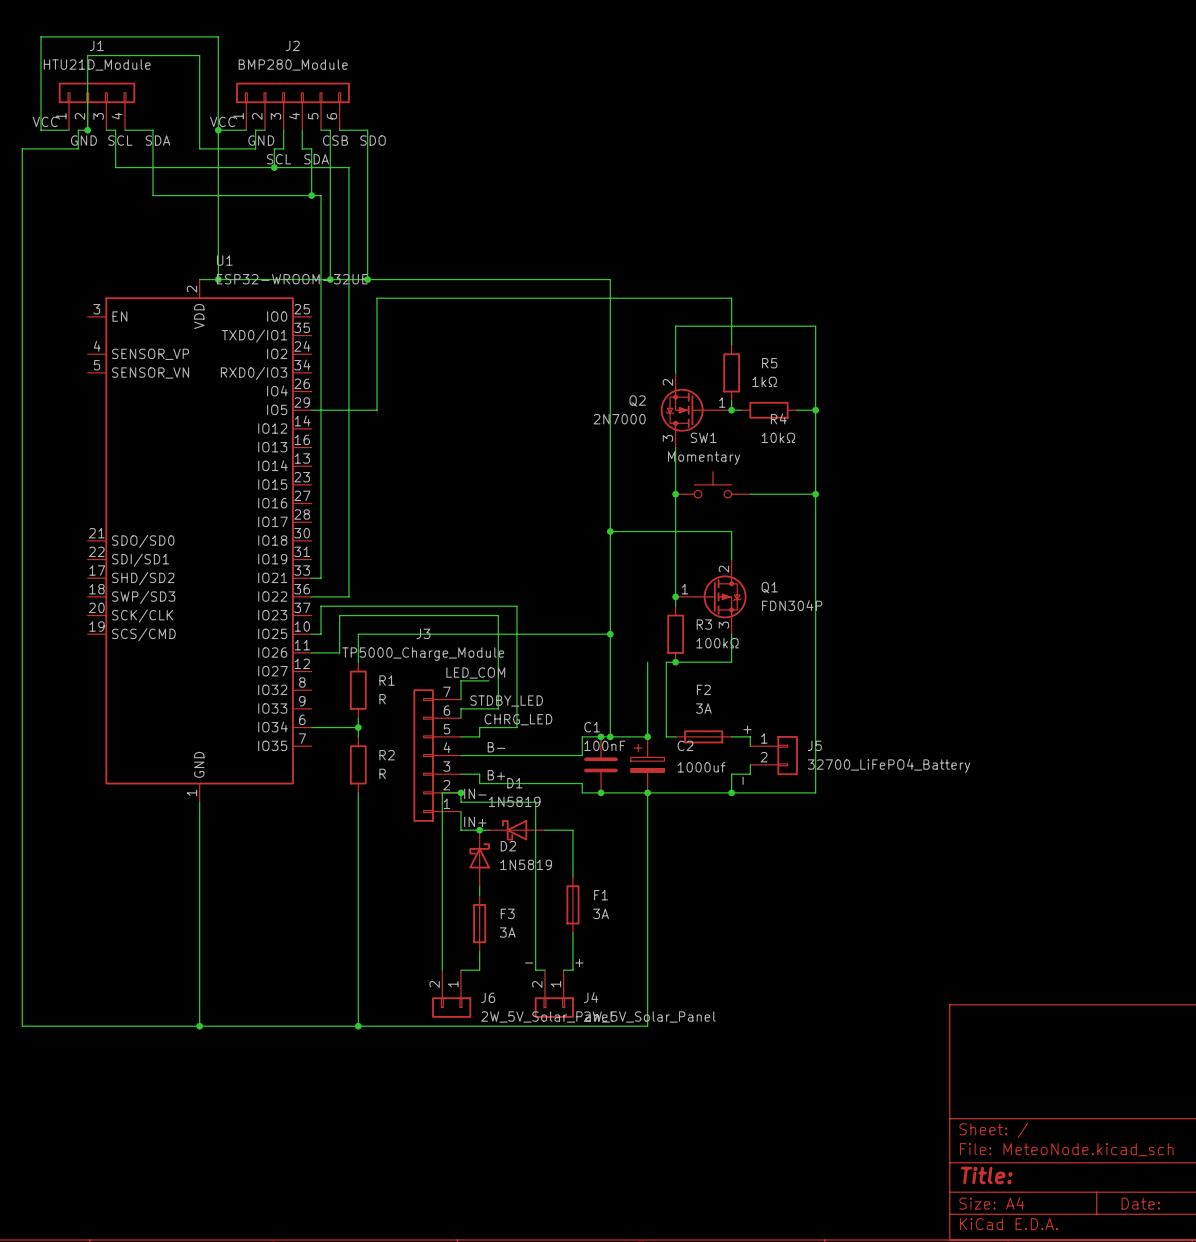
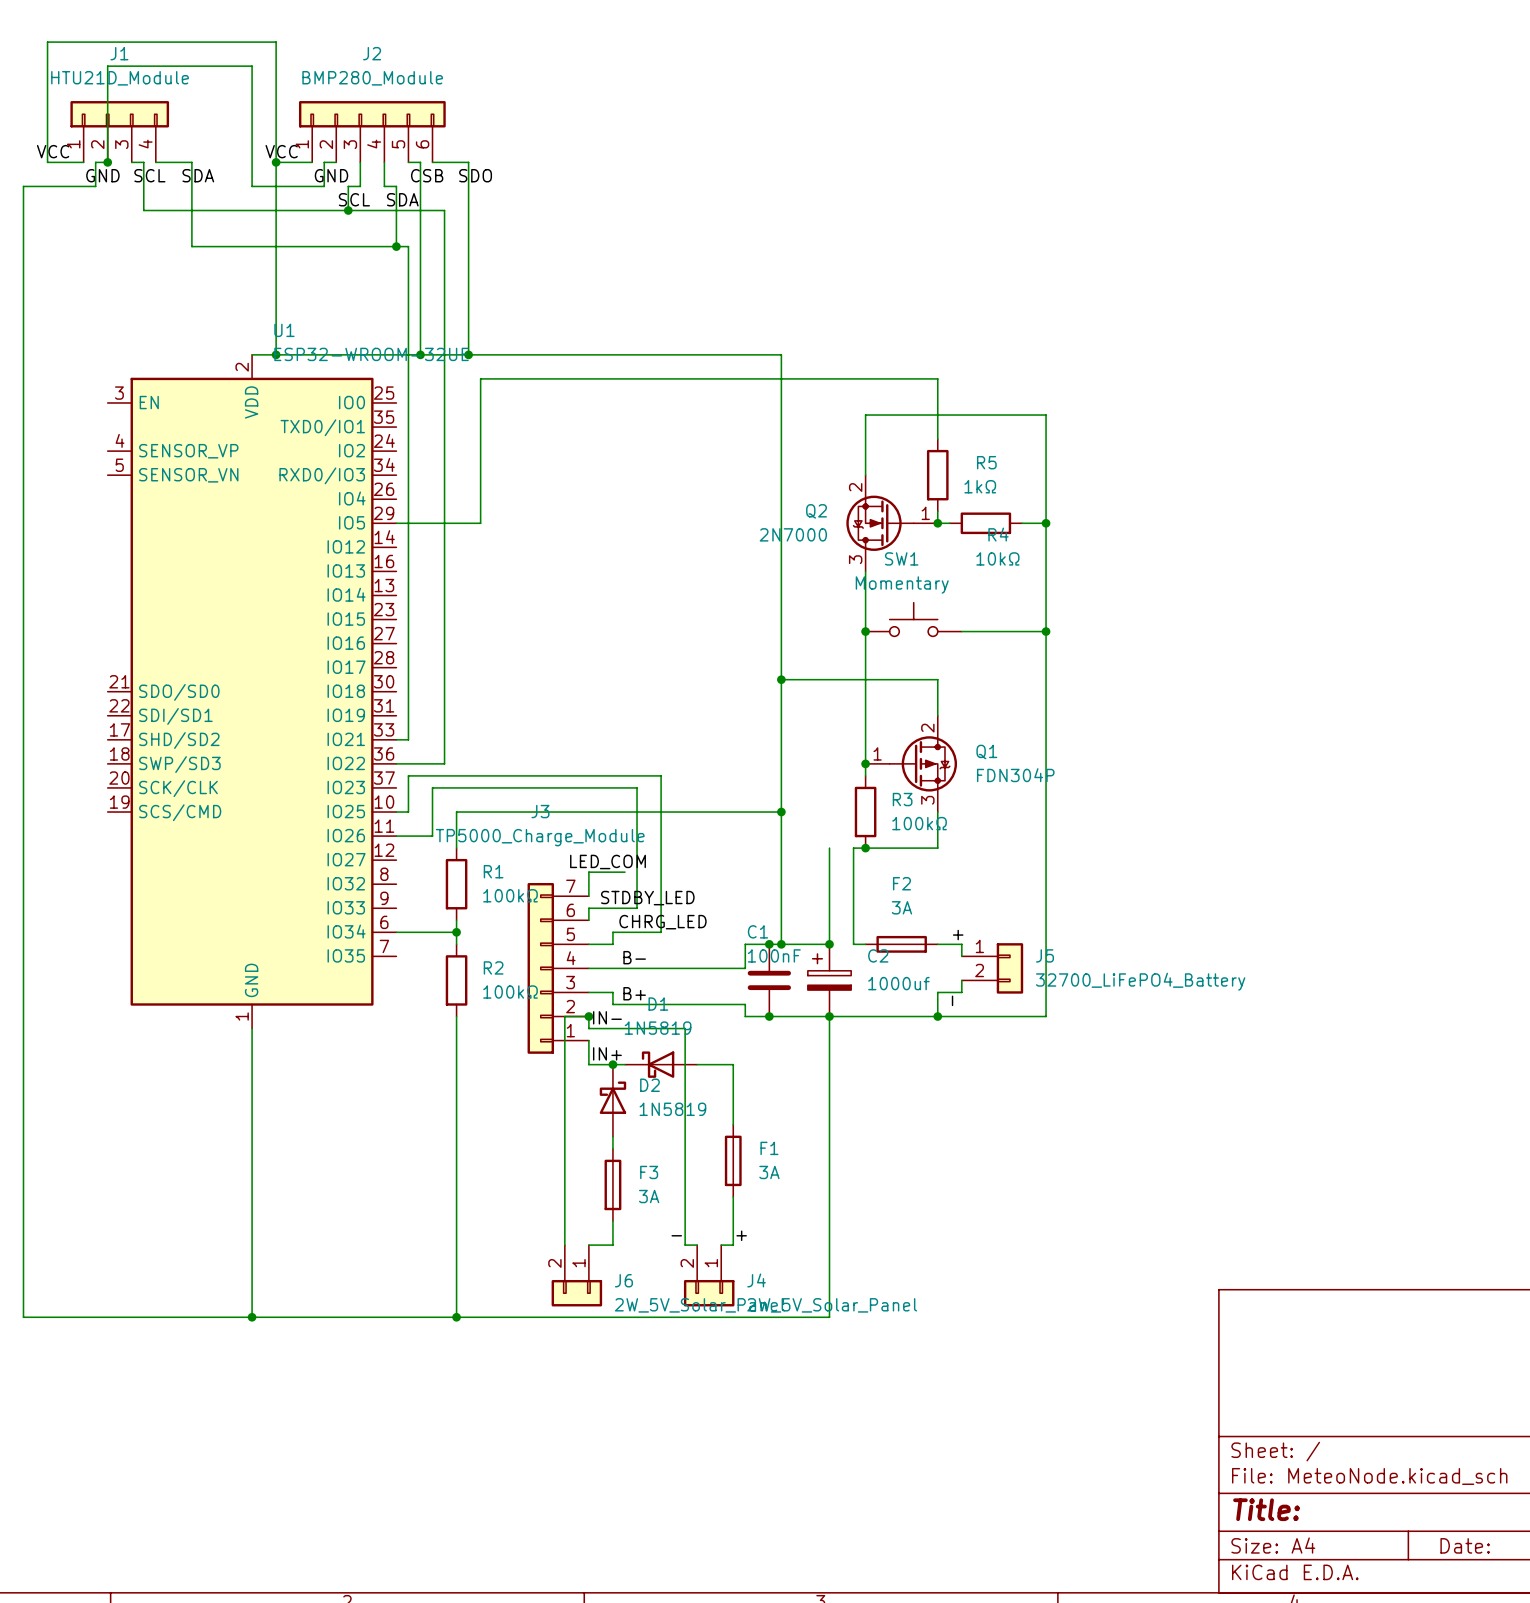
R1 value: R (382, 699) -> 100kΩ (510, 895)
R2 value: R (382, 773) -> 100kΩ (510, 992)

